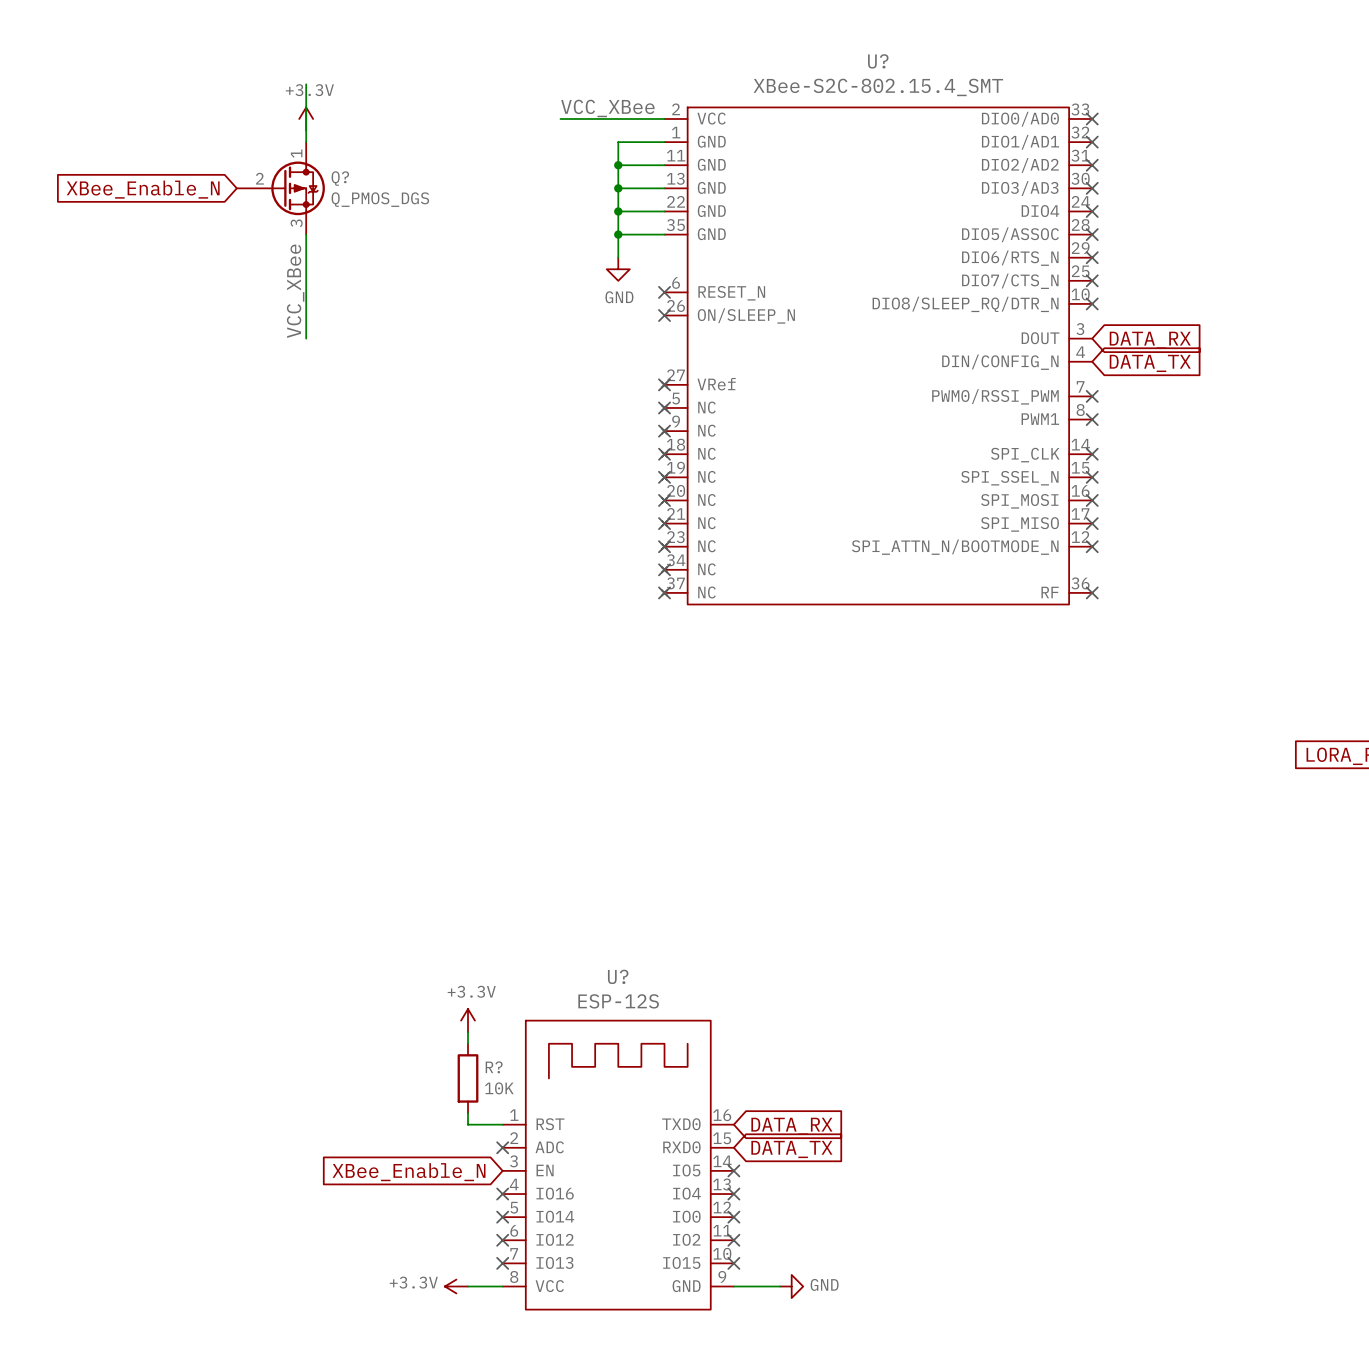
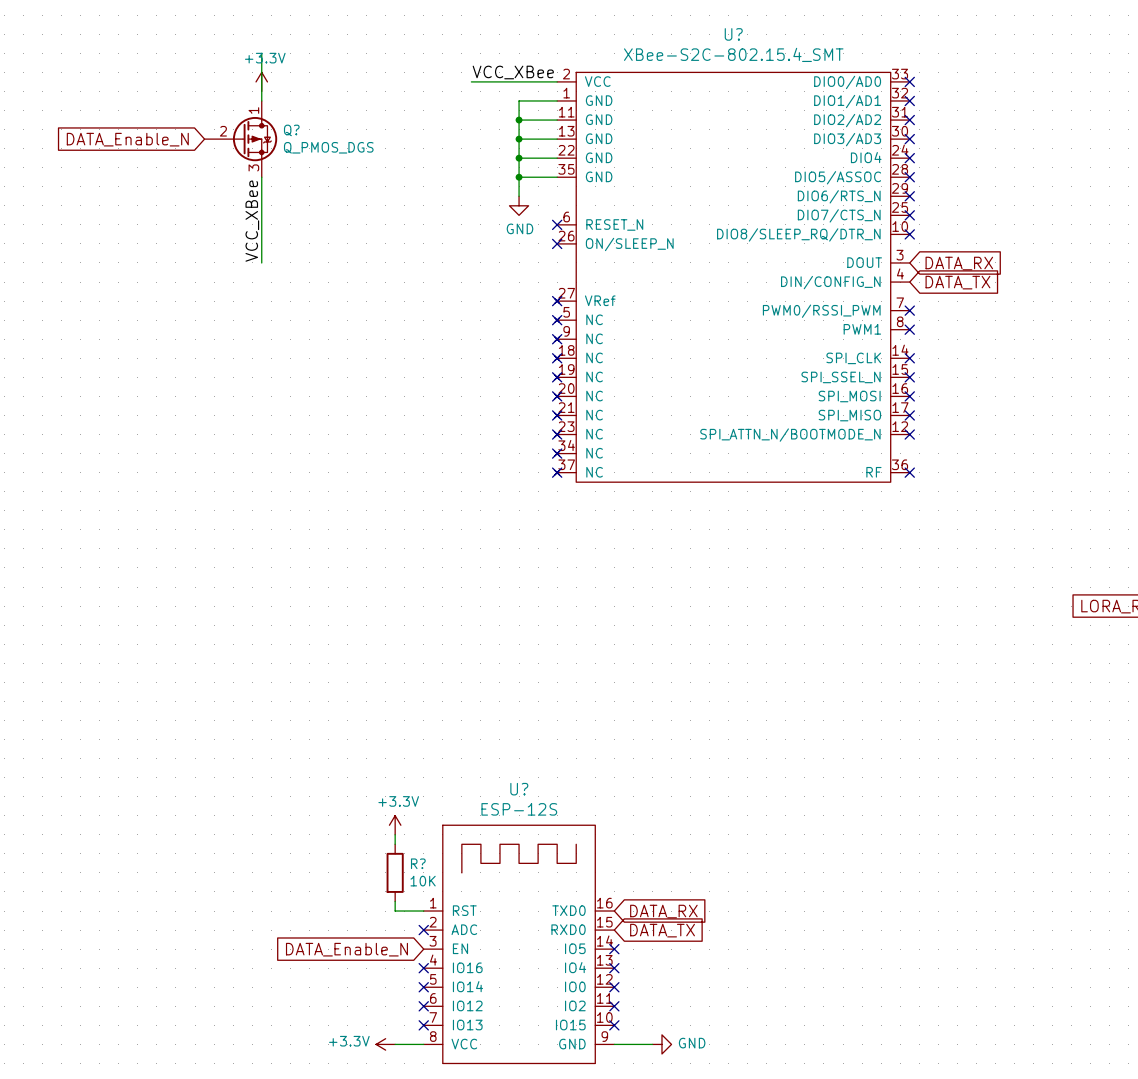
global label: XBee_Enable_N (143, 189) -> DATA_Enable_N (127, 139)
global label: XBee_Enable_N (409, 1172) -> DATA_Enable_N (346, 949)

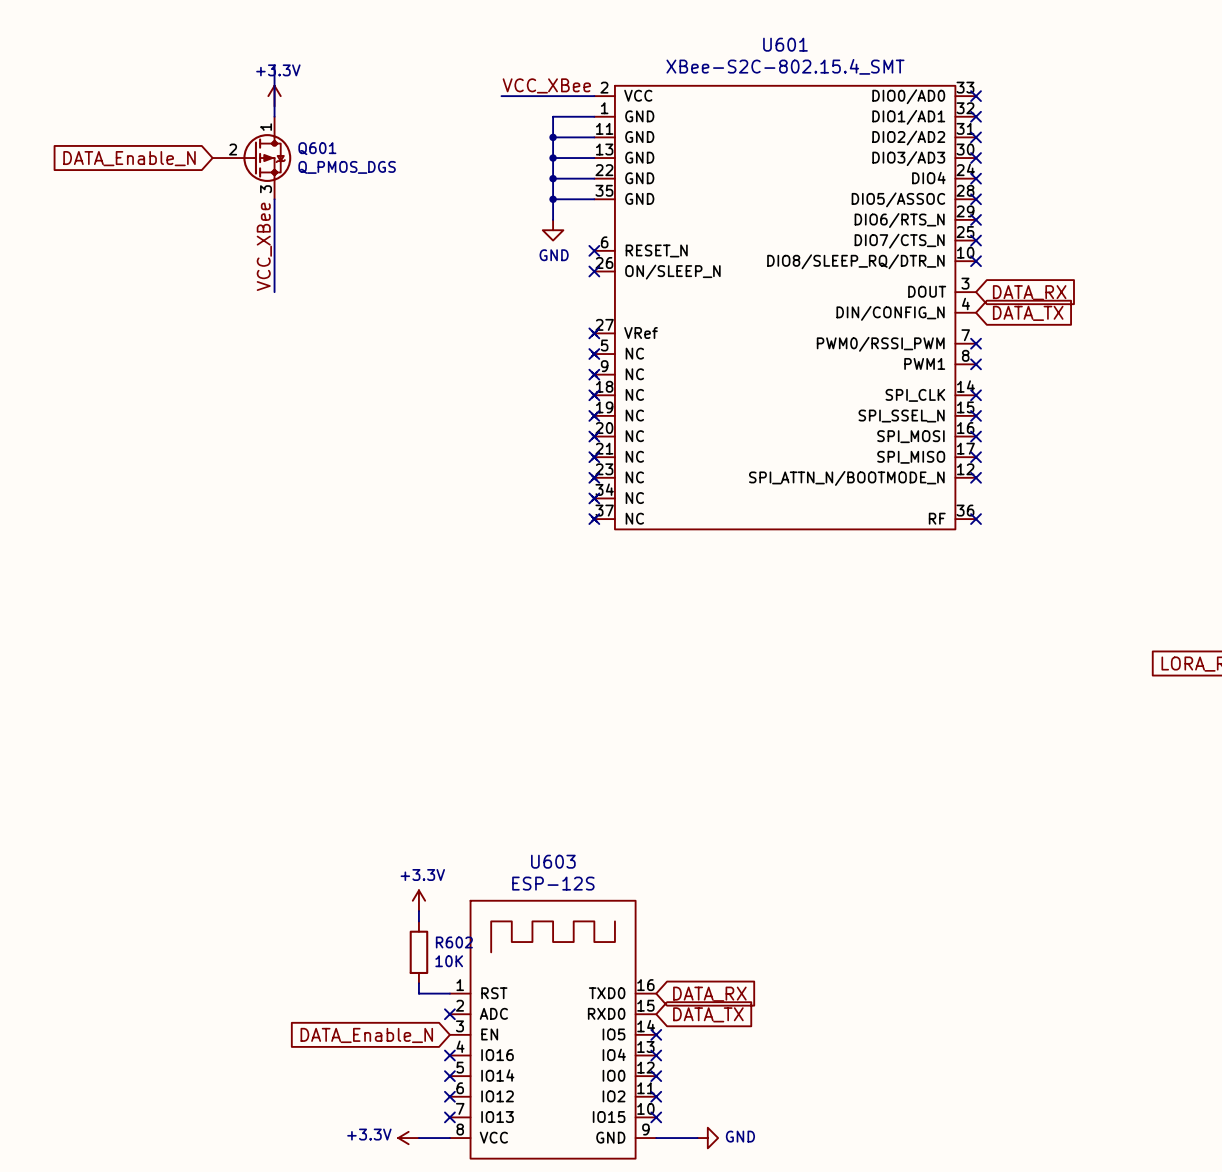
U? name: U? (733, 34) -> U601 (785, 44)
Q? name: Q? (291, 130) -> Q601 (317, 148)
U? name: U? (519, 789) -> U603 (553, 861)
R? name: R? (418, 863) -> R602 (454, 942)

